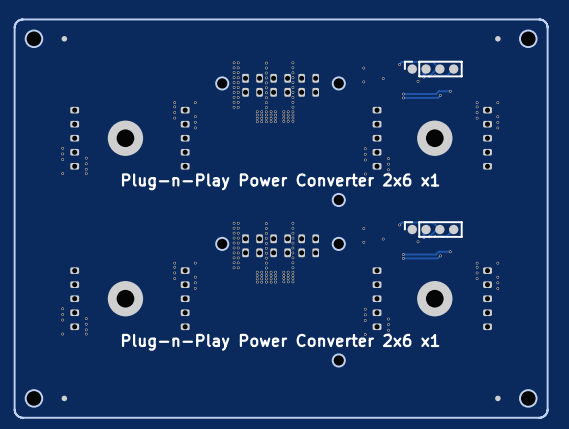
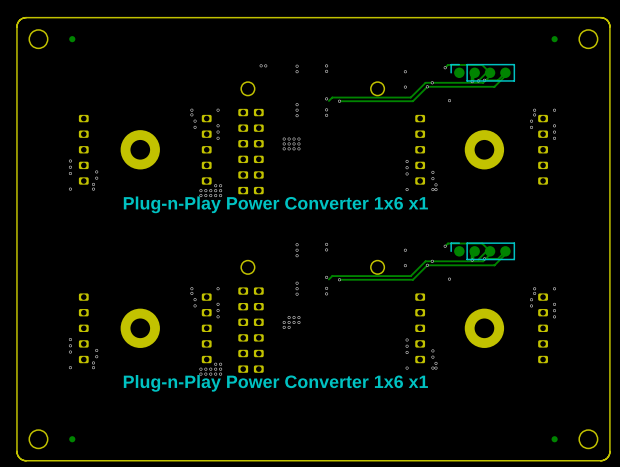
via: (234, 67) -> none
via: (238, 67) -> none
track: none -> (493, 72) (483, 82) (425, 82) (410, 97) (332, 97) (328, 100)
track: none -> (508, 72) (494, 86) (427, 86) (412, 101) (339, 101)
via: (234, 72) -> none
via: (238, 72) -> none
via: (266, 72) -> none
via: (292, 72) -> none
via: (234, 77) -> none
via: (238, 77) -> none
via: (266, 77) -> none
via: (292, 77) -> none
via: (383, 78) -> none
via: none -> (432, 82)
via: none -> (427, 86)
via: (418, 81) -> none
via: (234, 82) -> none
via: (238, 82) -> none
via: (266, 82) -> none
via: (292, 82) -> none
part: (280, 85) -> none
via: (234, 87) -> none
via: (238, 87) -> none
via: (266, 87) -> none
via: (292, 87) -> none
track: (450, 91) (438, 91) (436, 94) (403, 94) -> none
via: (450, 91) -> none
via: (234, 92) -> none
via: (238, 92) -> none
via: (266, 92) -> none
via: none -> (339, 101)
track: (440, 95) (437, 97) (403, 97) -> none
via: (440, 95) -> none
via: (234, 97) -> none
via: (238, 97) -> none
via: (292, 97) -> none
via: (403, 97) -> none
via: none -> (191, 110)
via: (174, 102) -> none
via: (234, 102) -> none
via: (238, 102) -> none
via: (477, 102) -> none
via: none -> (534, 110)
via: none -> (191, 114)
via: (174, 106) -> none
via: (477, 106) -> none
via: none -> (534, 114)
via: (234, 107) -> none
via: (238, 107) -> none
via: (257, 111) -> none
via: (261, 111) -> none
via: (266, 111) -> none
via: (271, 111) -> none
via: (275, 111) -> none
via: (283, 111) -> none
via: (288, 111) -> none
via: (292, 111) -> none
via: (257, 115) -> none
via: (261, 115) -> none
via: (266, 115) -> none
via: (271, 115) -> none
via: (275, 115) -> none
via: (283, 115) -> none
via: (288, 115) -> none
via: (292, 115) -> none
via: (257, 118) -> none
via: (261, 118) -> none
via: (266, 118) -> none
via: (271, 118) -> none
via: (275, 118) -> none
via: (283, 118) -> none
via: (288, 118) -> none
via: (292, 118) -> none
via: (257, 121) -> none
via: (261, 121) -> none
via: (266, 121) -> none
via: (271, 121) -> none
via: (275, 121) -> none
via: (283, 121) -> none
via: (288, 121) -> none
via: (292, 121) -> none
via: none -> (284, 139)
via: none -> (289, 139)
via: none -> (294, 139)
via: none -> (298, 139)
via: none -> (284, 143)
via: none -> (289, 143)
via: none -> (294, 143)
via: none -> (298, 143)
via: none -> (284, 148)
via: none -> (289, 148)
via: none -> (294, 148)
via: none -> (298, 148)
part: none -> (251, 151)
via: none -> (93, 184)
via: (86, 169) -> none
via: (388, 169) -> none
via: none -> (436, 184)
via: none -> (215, 185)
via: none -> (220, 185)
via: none -> (93, 189)
via: (86, 173) -> none
via: none -> (436, 189)
via: none -> (200, 190)
via: none -> (205, 190)
via: none -> (210, 190)
via: none -> (215, 190)
via: none -> (220, 190)
via: none -> (200, 195)
via: none -> (205, 195)
via: none -> (210, 195)
via: none -> (215, 195)
via: none -> (220, 195)
text: Plug-n-Play Power Converter 2x6 x1 (280, 181) -> Plug-n-Play Power Converter 1x6 x1 (275, 204)
part: (338, 199) -> none
via: (234, 223) -> none
via: (238, 223) -> none
via: (234, 228) -> none
via: (238, 228) -> none
track: none -> (493, 251) (483, 261) (425, 261) (410, 276) (332, 276) (328, 279)
track: none -> (508, 251) (494, 265) (427, 265) (412, 279) (339, 279)
via: (234, 233) -> none
via: (238, 233) -> none
via: (292, 233) -> none
via: (234, 238) -> none
via: (238, 238) -> none
via: (266, 238) -> none
via: (292, 238) -> none
via: none -> (432, 261)
via: (383, 239) -> none
via: (418, 241) -> none
via: none -> (427, 265)
via: (234, 243) -> none
via: (238, 243) -> none
via: (266, 243) -> none
via: (292, 243) -> none
part: (280, 245) -> none
via: (234, 247) -> none
via: (238, 248) -> none
via: (266, 248) -> none
via: (292, 248) -> none
track: (450, 251) (438, 251) (436, 254) (403, 254) -> none
via: (450, 251) -> none
via: (234, 252) -> none
via: (238, 252) -> none
via: (266, 253) -> none
via: none -> (339, 279)
track: (440, 255) (437, 258) (403, 258) -> none
via: (440, 255) -> none
via: (234, 257) -> none
via: (238, 257) -> none
via: (292, 257) -> none
via: (403, 258) -> none
via: (234, 262) -> none
via: (238, 262) -> none
via: none -> (191, 288)
via: (174, 263) -> none
via: (477, 263) -> none
via: none -> (534, 288)
via: none -> (191, 293)
via: (174, 267) -> none
via: (234, 267) -> none
via: (238, 267) -> none
via: (477, 267) -> none
via: none -> (534, 293)
via: (257, 272) -> none
via: (261, 272) -> none
via: (266, 272) -> none
via: (271, 272) -> none
via: (275, 272) -> none
via: (283, 272) -> none
via: (288, 272) -> none
via: (292, 272) -> none
via: (257, 275) -> none
via: (261, 275) -> none
via: (266, 275) -> none
via: (271, 275) -> none
via: (275, 275) -> none
via: (283, 275) -> none
via: (288, 275) -> none
via: (292, 275) -> none
via: (257, 278) -> none
via: (261, 278) -> none
via: (266, 278) -> none
via: (271, 278) -> none
via: (275, 278) -> none
via: (283, 278) -> none
via: (288, 278) -> none
via: (292, 278) -> none
via: (283, 281) -> none
via: (288, 281) -> none
via: (292, 281) -> none
via: (257, 282) -> none
via: (261, 282) -> none
via: (266, 282) -> none
via: (271, 282) -> none
via: (275, 282) -> none
via: none -> (289, 317)
via: none -> (294, 317)
via: none -> (298, 317)
via: none -> (284, 322)
via: none -> (289, 322)
via: none -> (294, 322)
via: none -> (298, 322)
via: none -> (284, 327)
via: none -> (289, 327)
part: none -> (251, 330)
via: none -> (93, 362)
via: (86, 329) -> none
via: (388, 330) -> none
via: none -> (436, 363)
via: none -> (215, 364)
via: none -> (220, 364)
via: none -> (93, 367)
via: (86, 334) -> none
via: none -> (436, 368)
via: none -> (200, 369)
via: none -> (205, 369)
via: none -> (210, 369)
via: none -> (215, 369)
via: none -> (220, 369)
via: none -> (200, 374)
via: none -> (205, 374)
via: none -> (210, 374)
via: none -> (215, 374)
via: none -> (220, 374)
text: Plug-n-Play Power Converter 2x6 x1 (280, 342) -> Plug-n-Play Power Converter 1x6 x1 (275, 383)
part: (338, 360) -> none

